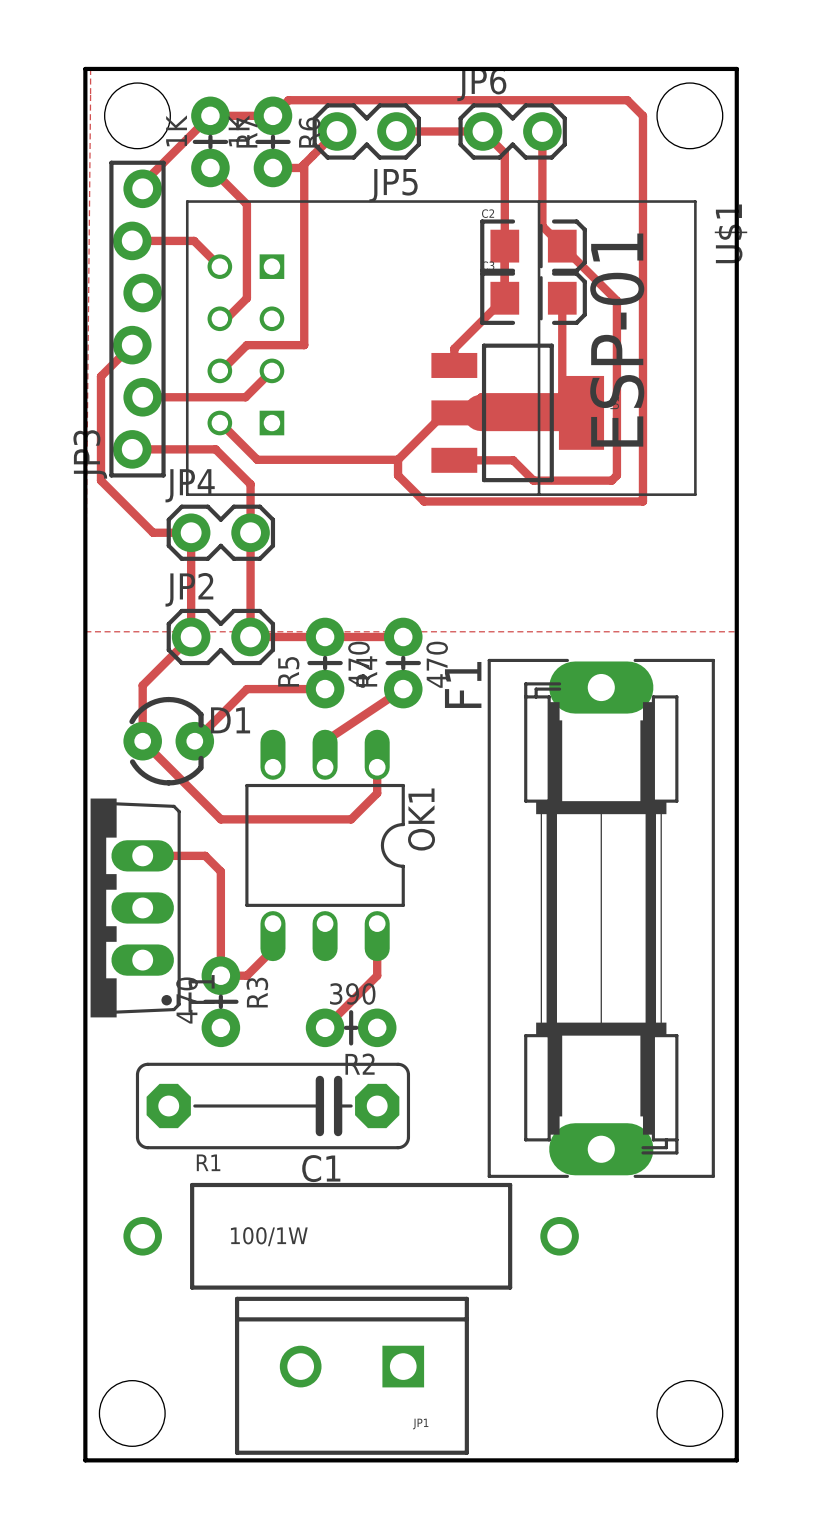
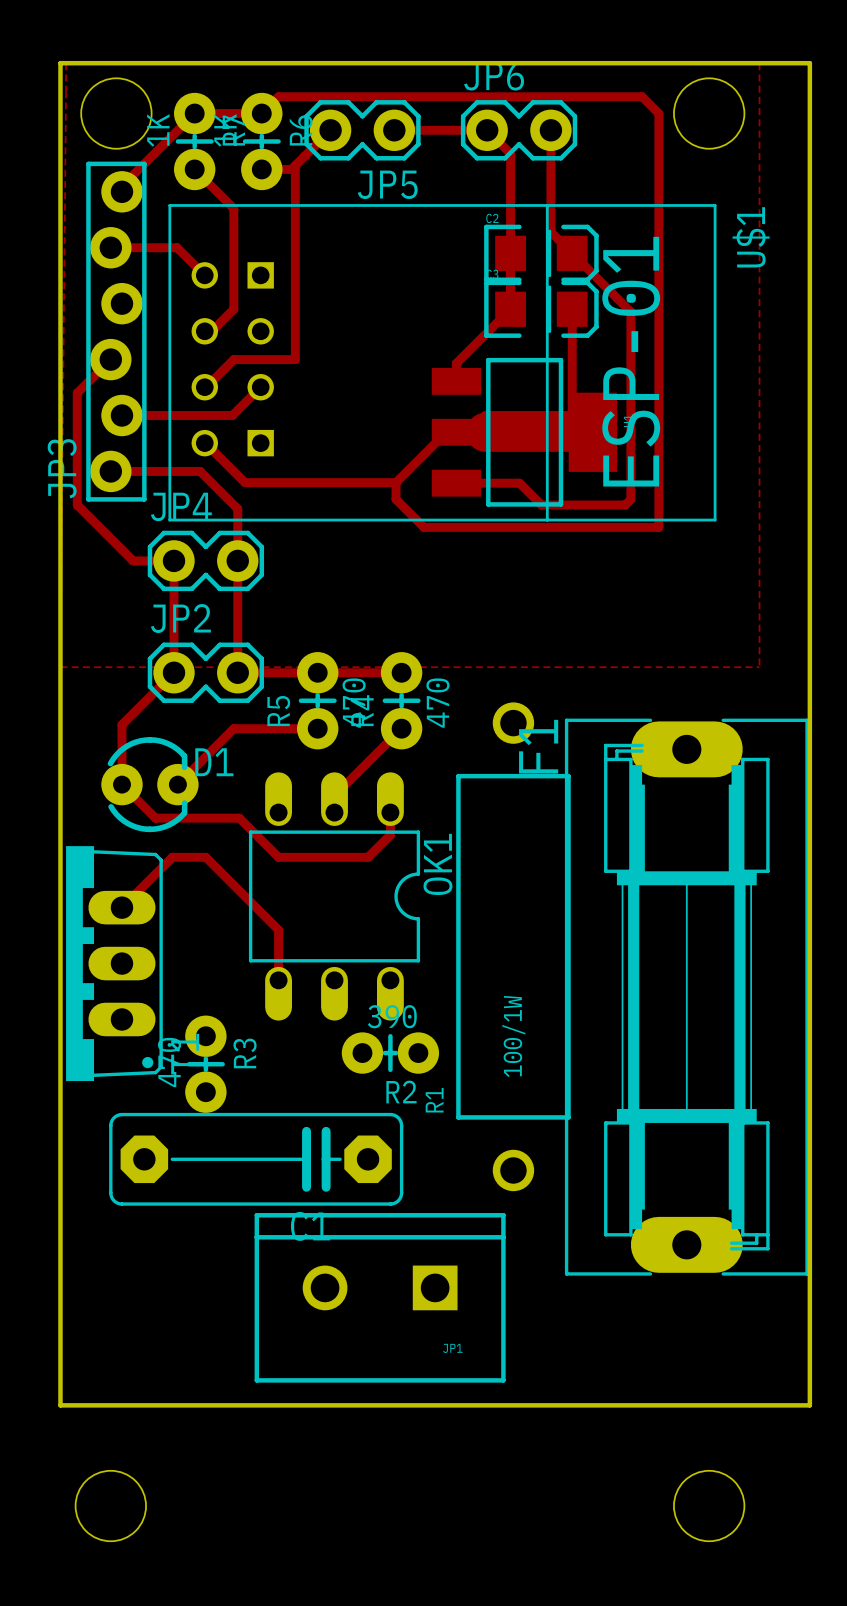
board edge: (736, 68) (736, 1460) (85, 1460) (85, 1319) -> (759, 63) (809, 63) (809, 1405) (60, 1405)
track: (403, 689) (325, 741) (325, 767) -> (401, 728) (334, 795) (334, 812)
track: (377, 767) (377, 793) (351, 819) (220, 819) (173, 772) -> (390, 812) (390, 834) (368, 857) (278, 857) (239, 818) (155, 818)
OK1 position: (325, 845) -> (334, 896)
track: (142, 855) (205, 855) (220, 871) (220, 975) (246, 975) (272, 949) (272, 923) -> (121, 907) (172, 857) (205, 857) (278, 930) (278, 980)
F1 position: (601, 918) -> (686, 997)
track: (377, 923) (377, 975) (325, 1027) -> none
R2 position: (351, 1027) -> (390, 1053)
C1 position: (272, 1106) -> (256, 1159)
R1 name position: R1 (208, 1162) -> R1 (434, 1100)
R1 value position: 100/1W (269, 1236) -> 100/1W (513, 1036)
R1 rotation: 0° (351, 1236) -> 90° clockwise (513, 946)
R1 position: (351, 1236) -> (513, 946)
JP1 position: (351, 1375) -> (380, 1297)

